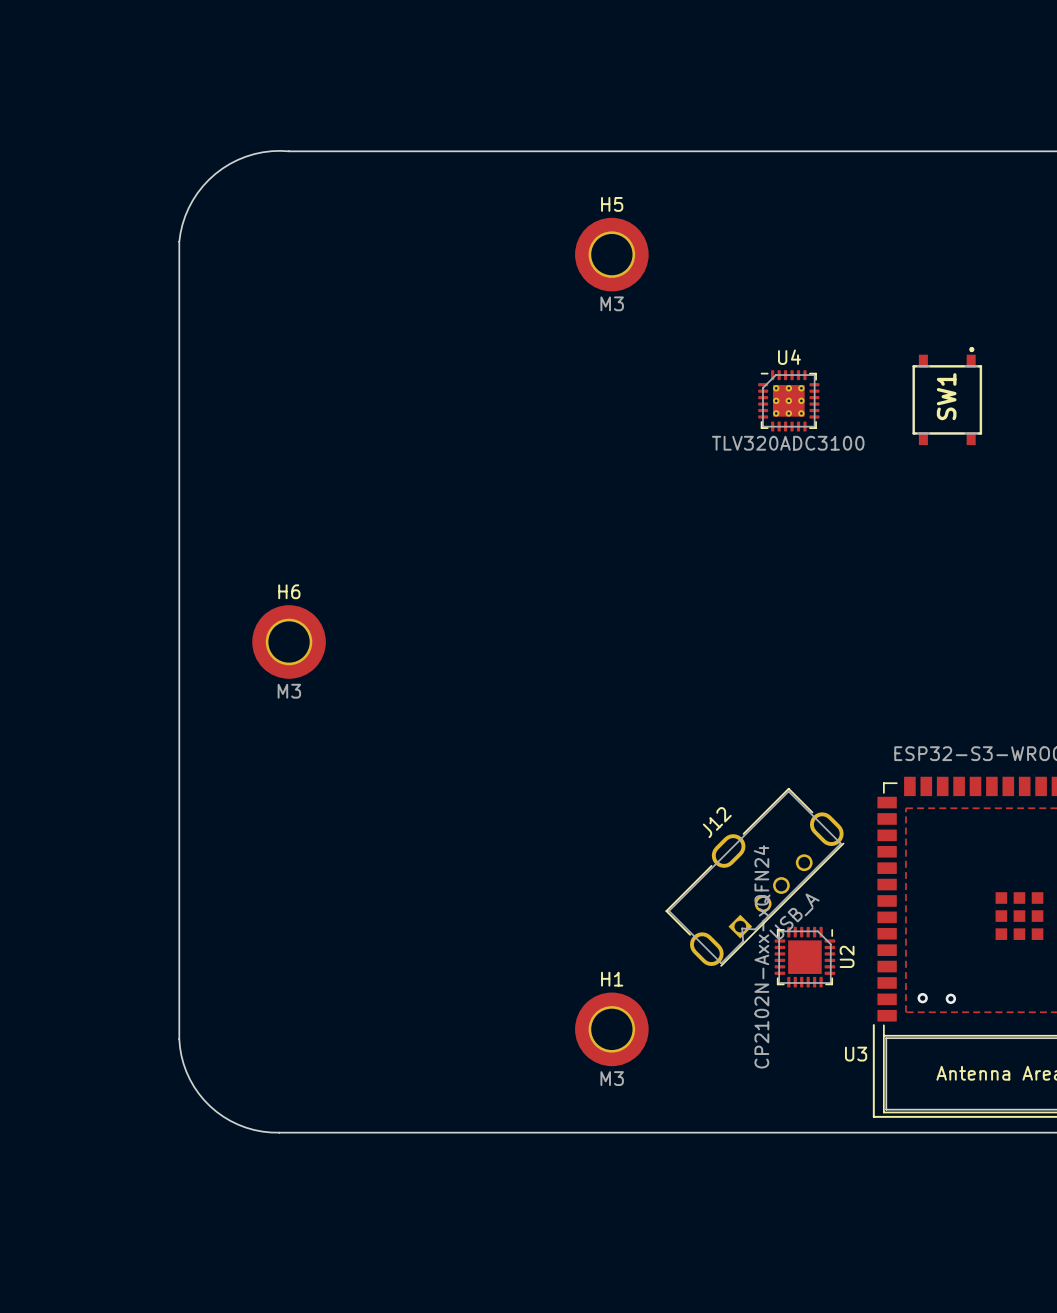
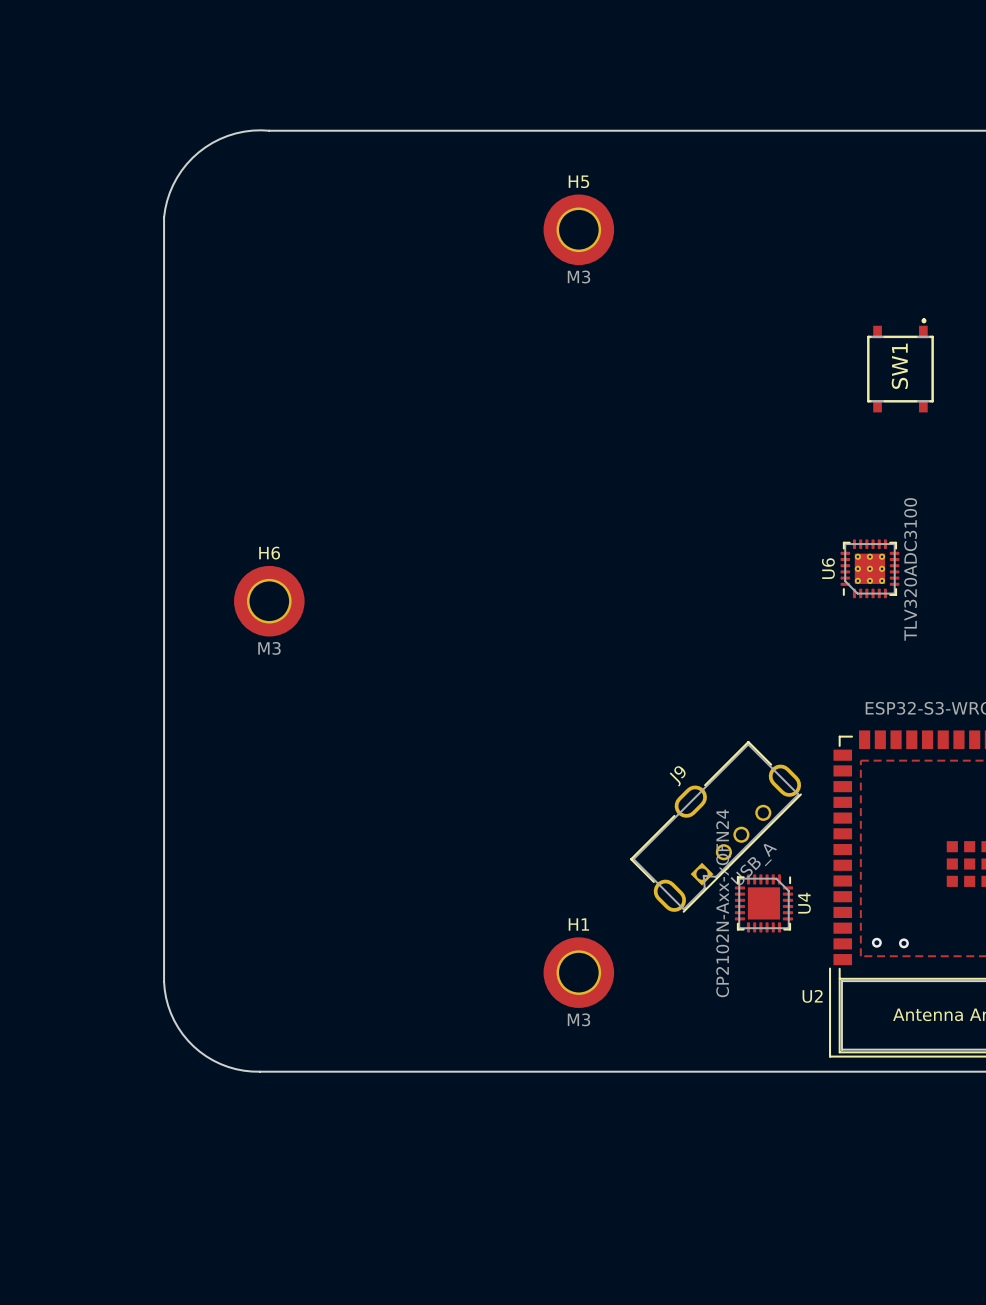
U4: TLV320ADC3100 (788, 400) -> none
U6: none -> TLV320ADC3100 (869, 568)
J12 name: J12 (717, 822) -> J9 (677, 776)
U2 name: U2 (847, 956) -> U4 (804, 903)
U3 name: U3 (856, 1054) -> U2 (812, 996)

